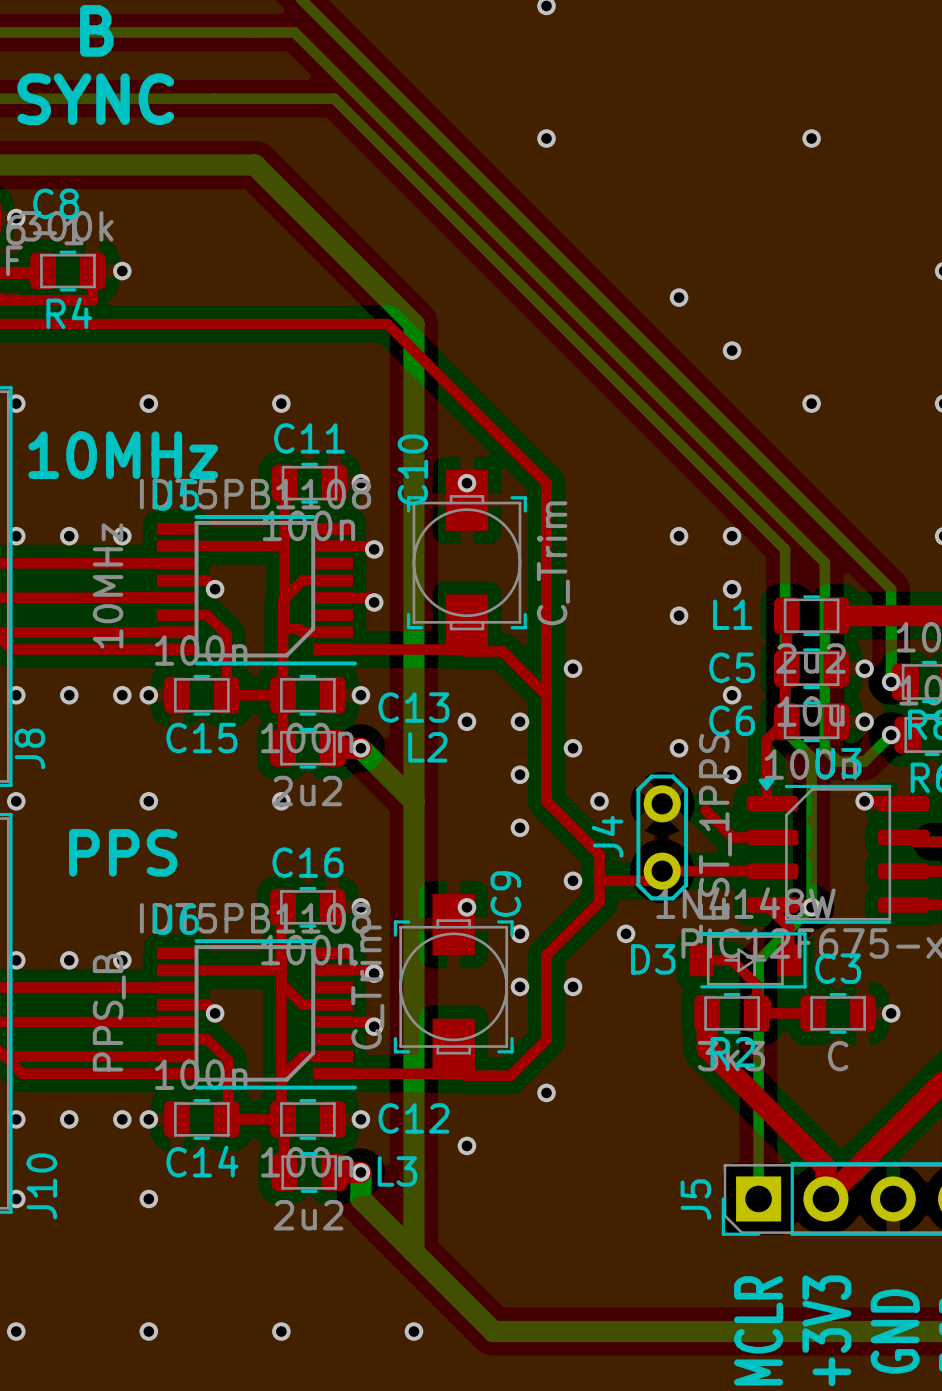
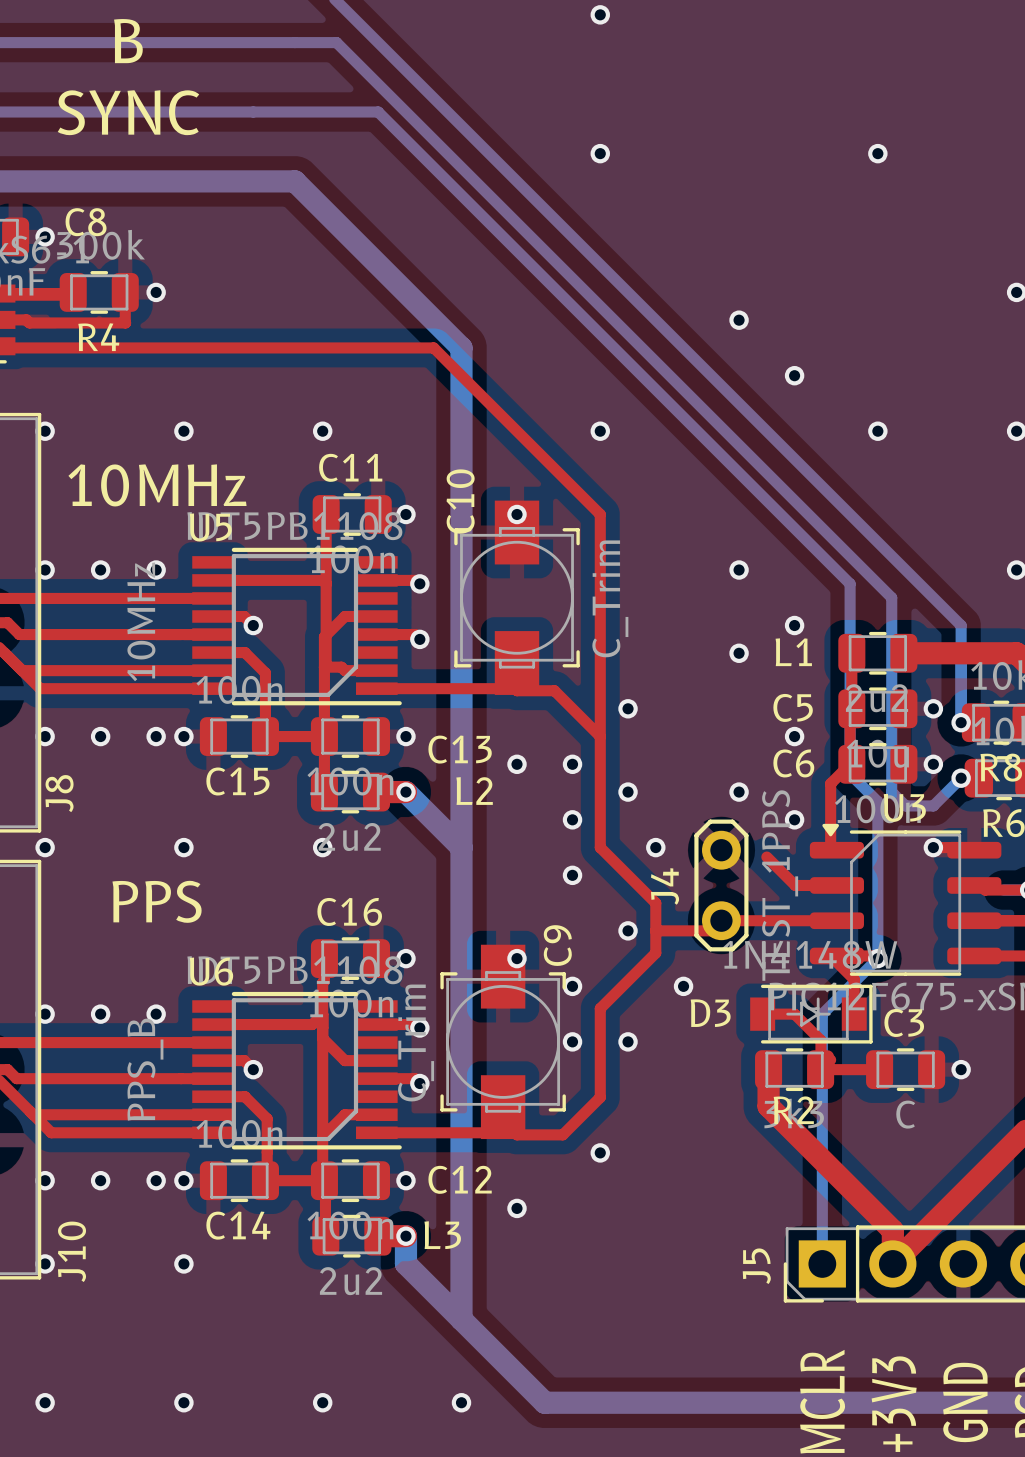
via: none -> (600, 431)
via: (732, 536) -> none

